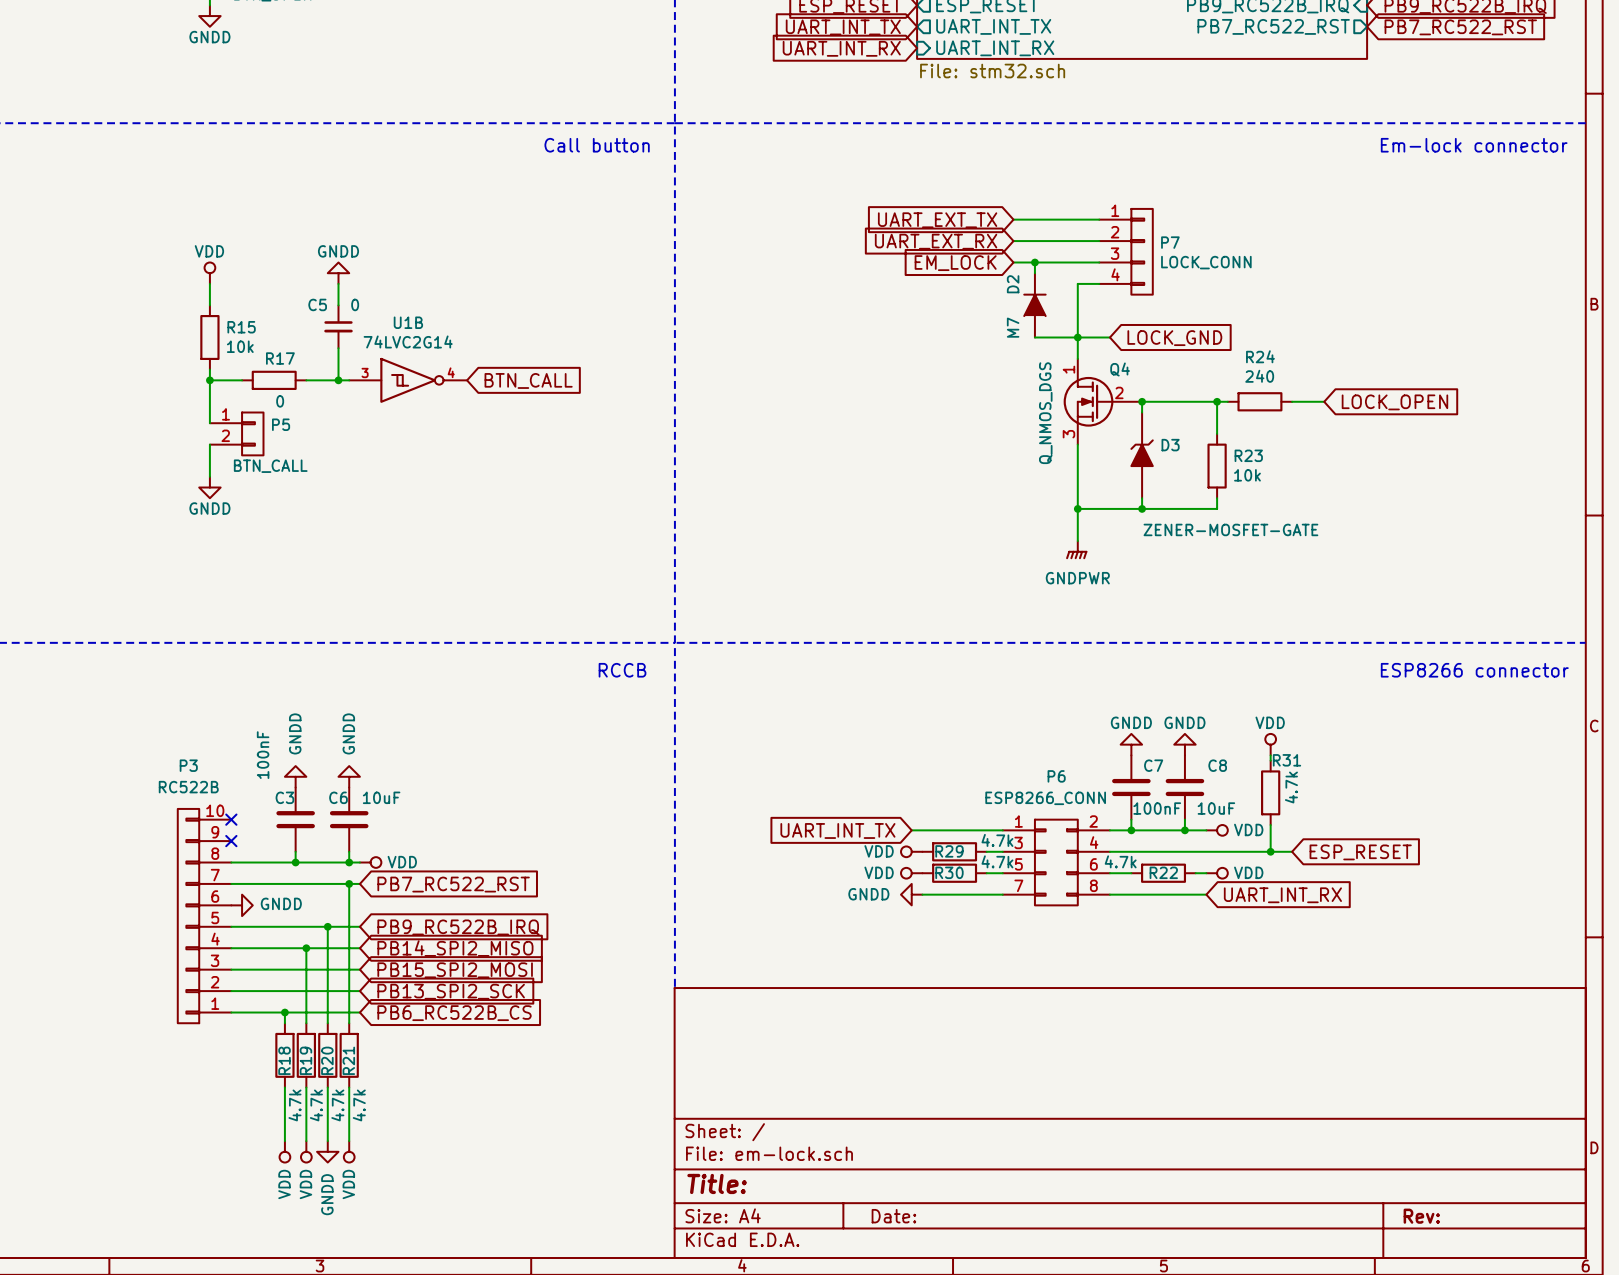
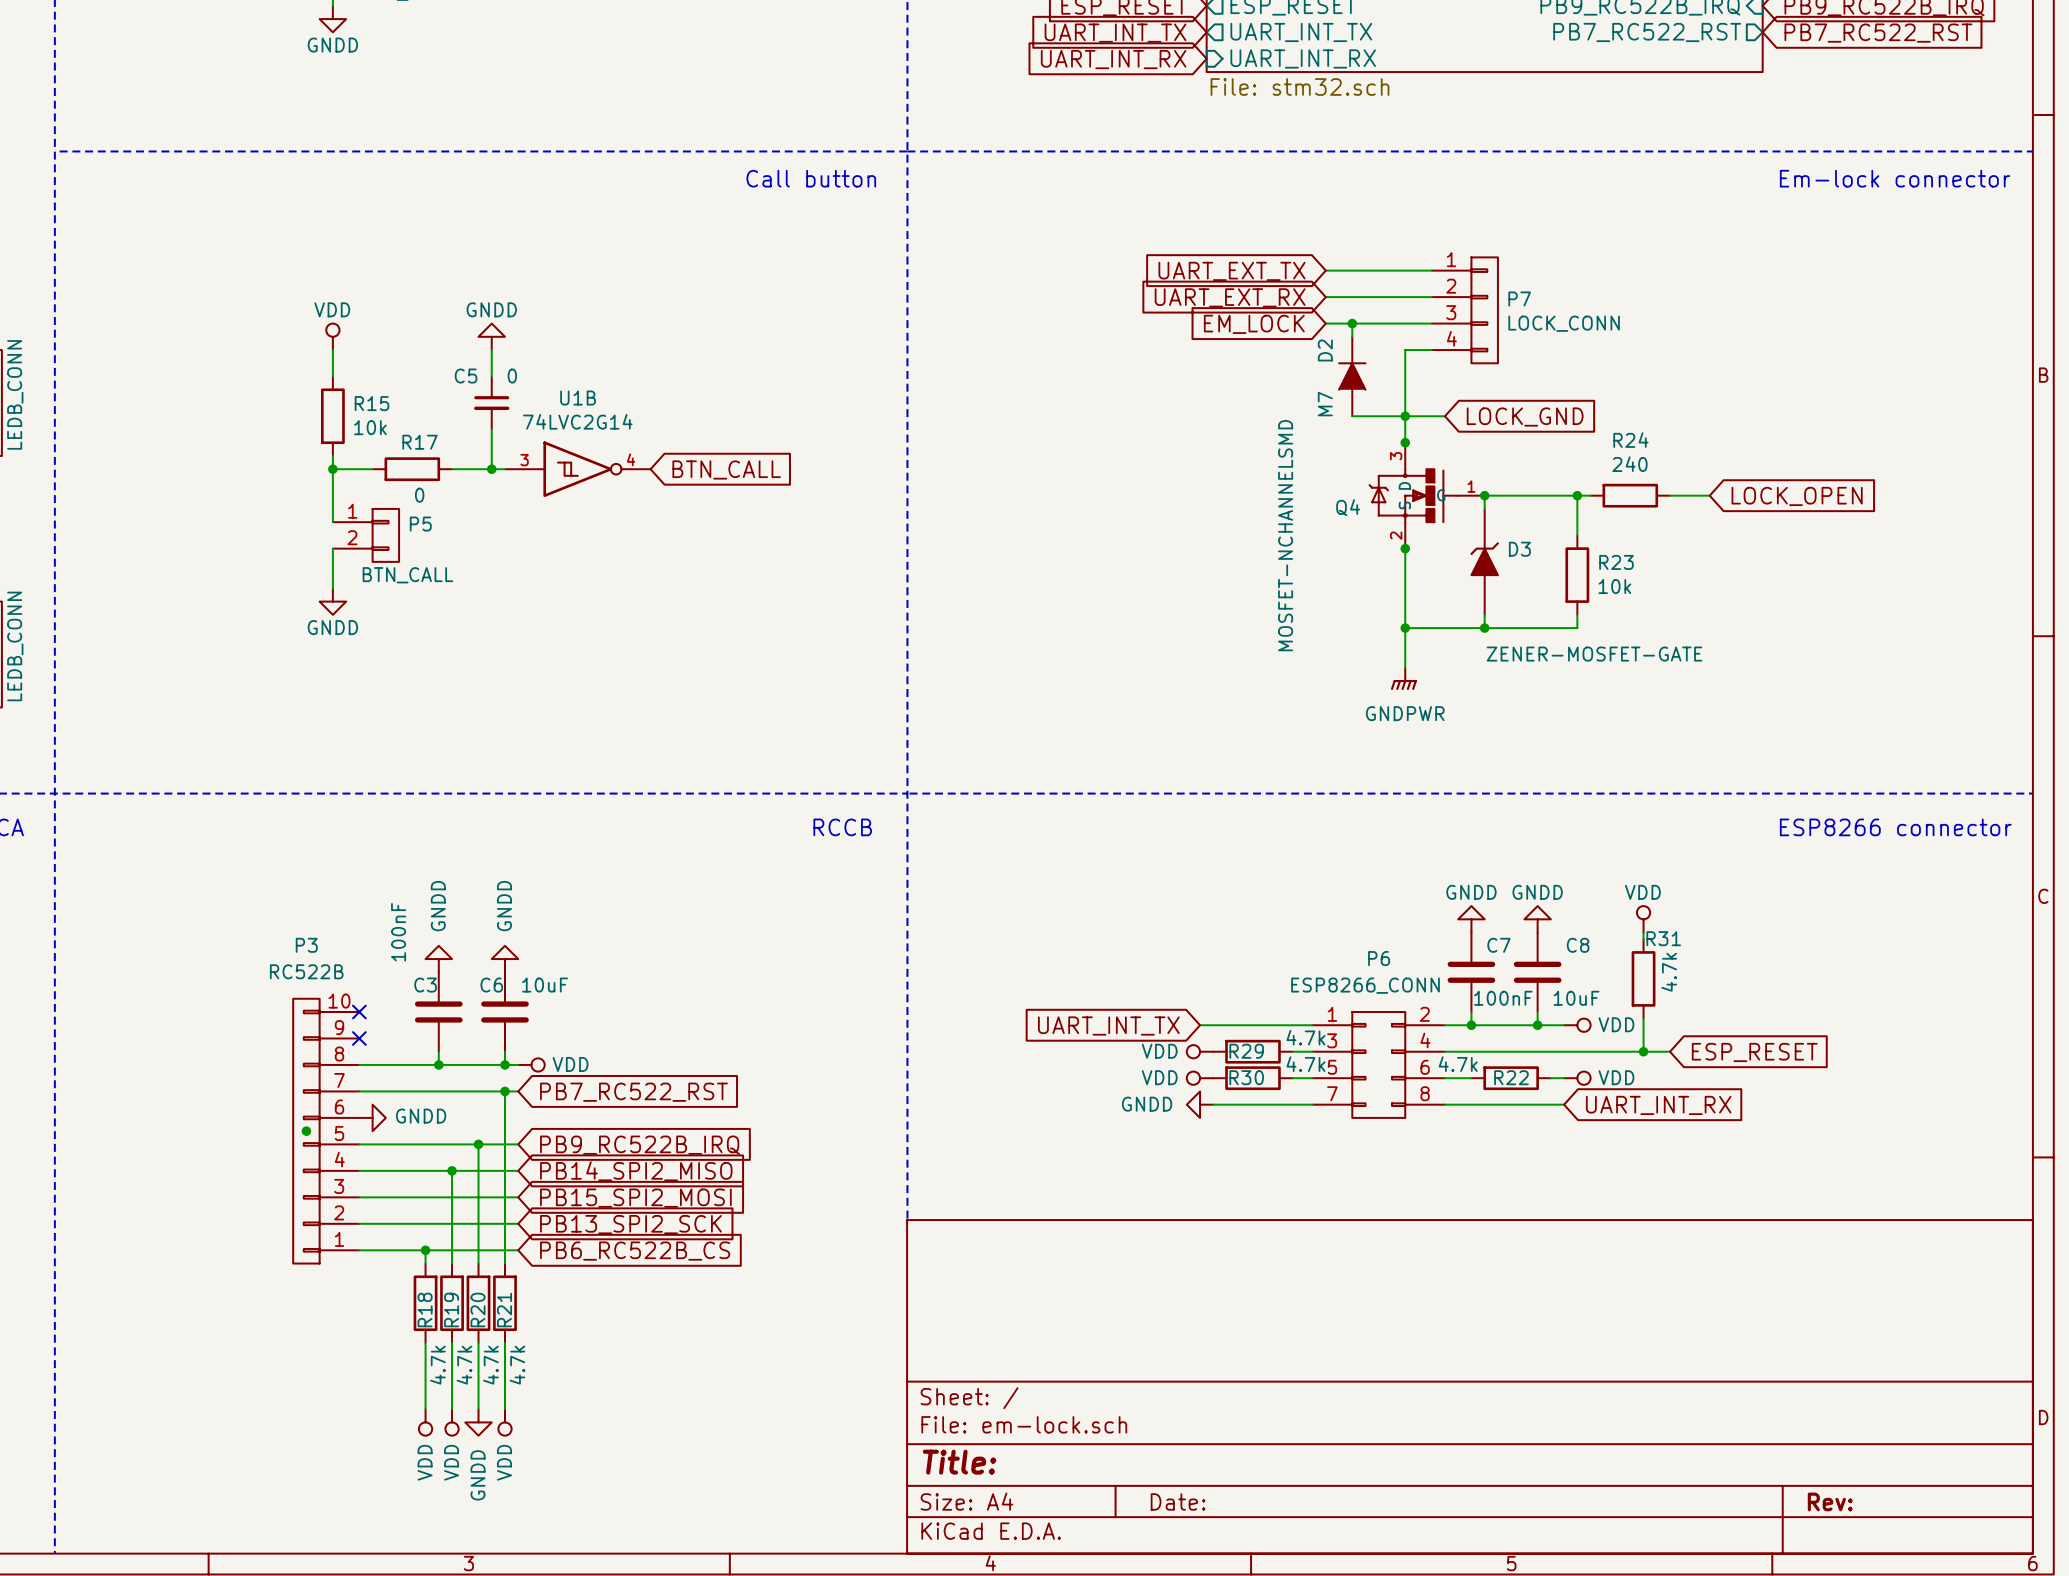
Q4 symbol: [1063, 358, 1143, 445] -> [1369, 442, 1485, 549]
junction: none -> (1405, 442)
Q4 name position: Q4 (1120, 369) -> Q4 (1348, 507)
Q4 value: Q_NMOS_DGS (1045, 413) -> MOSFET-NCHANNELSMD (1285, 535)
junction: none -> (1405, 548)
junction: none -> (306, 1131)

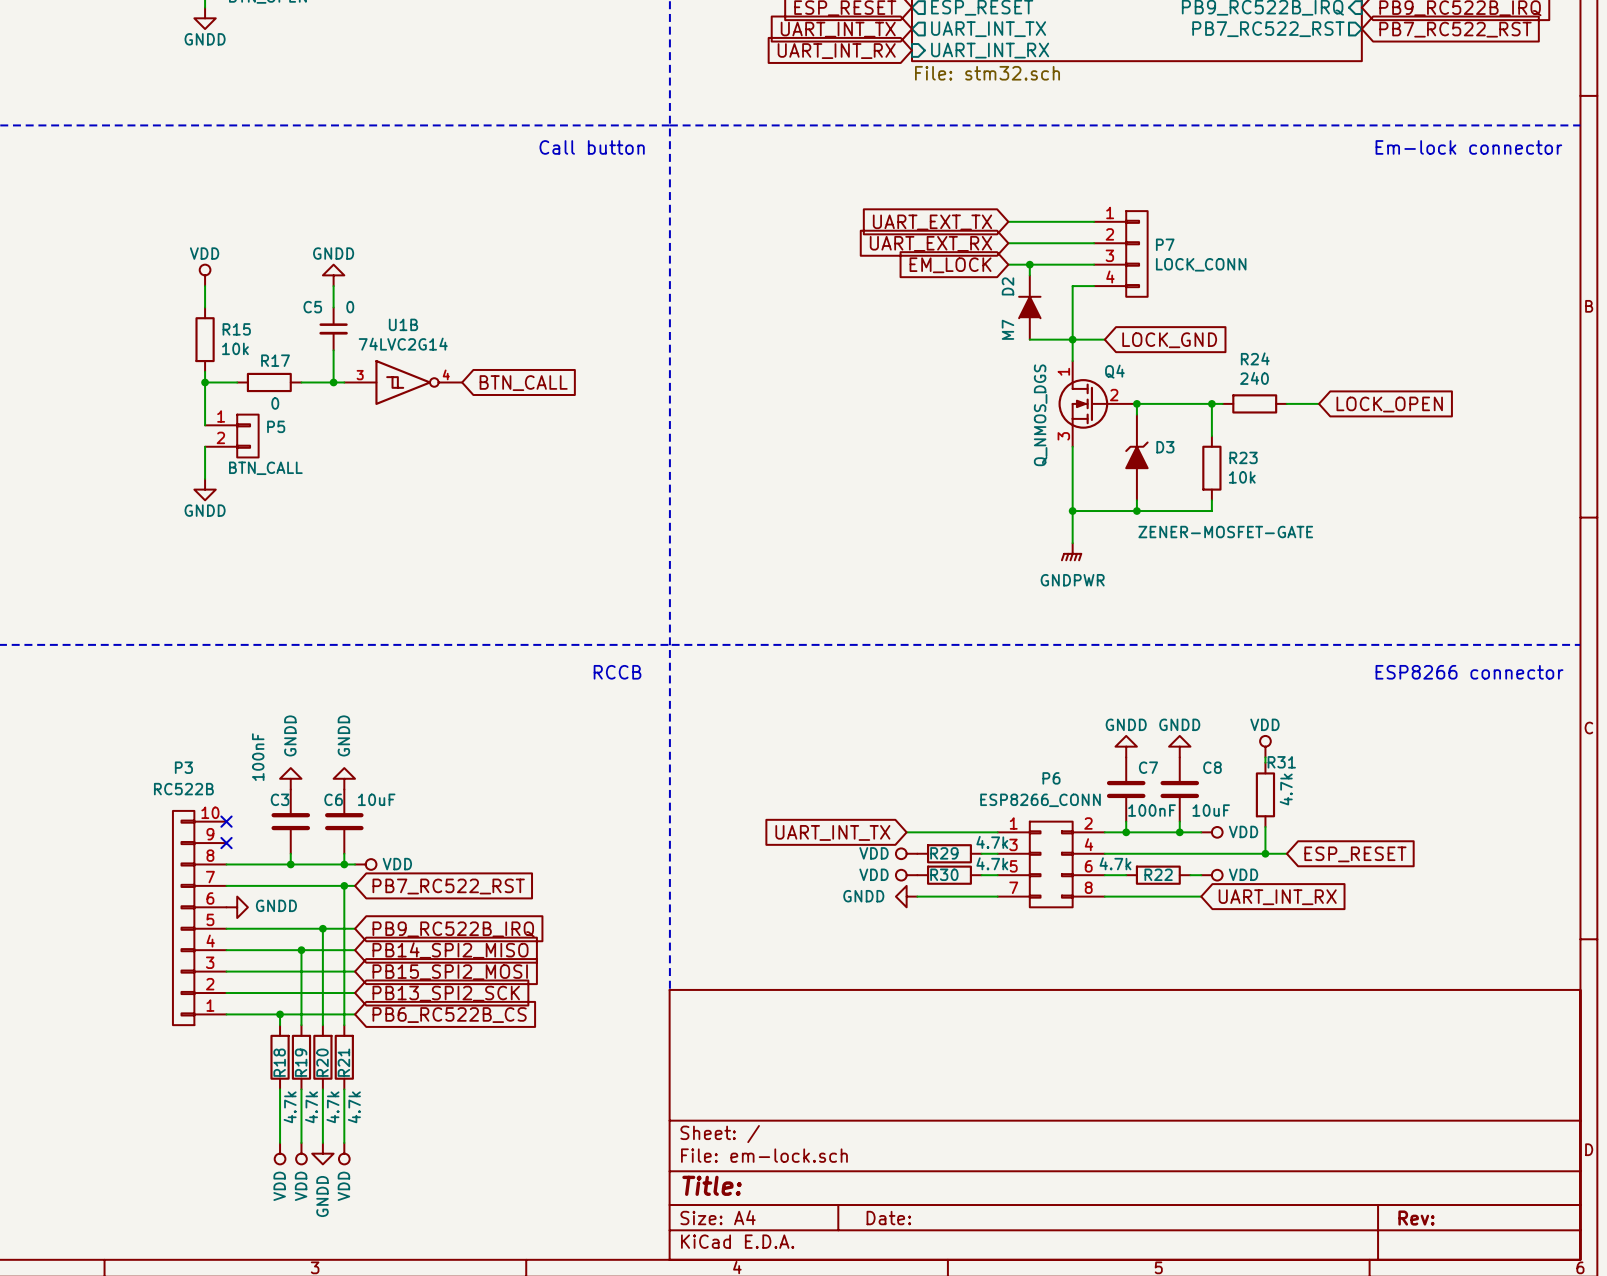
Q4 symbol: [1369, 442, 1485, 549] -> [1058, 361, 1137, 447]
junction: (1405, 442) -> none
Q4 name position: Q4 (1348, 507) -> Q4 (1114, 371)
Q4 value: MOSFET-NCHANNELSMD (1285, 535) -> Q_NMOS_DGS (1040, 415)
junction: (1405, 548) -> none
junction: (306, 1131) -> none

